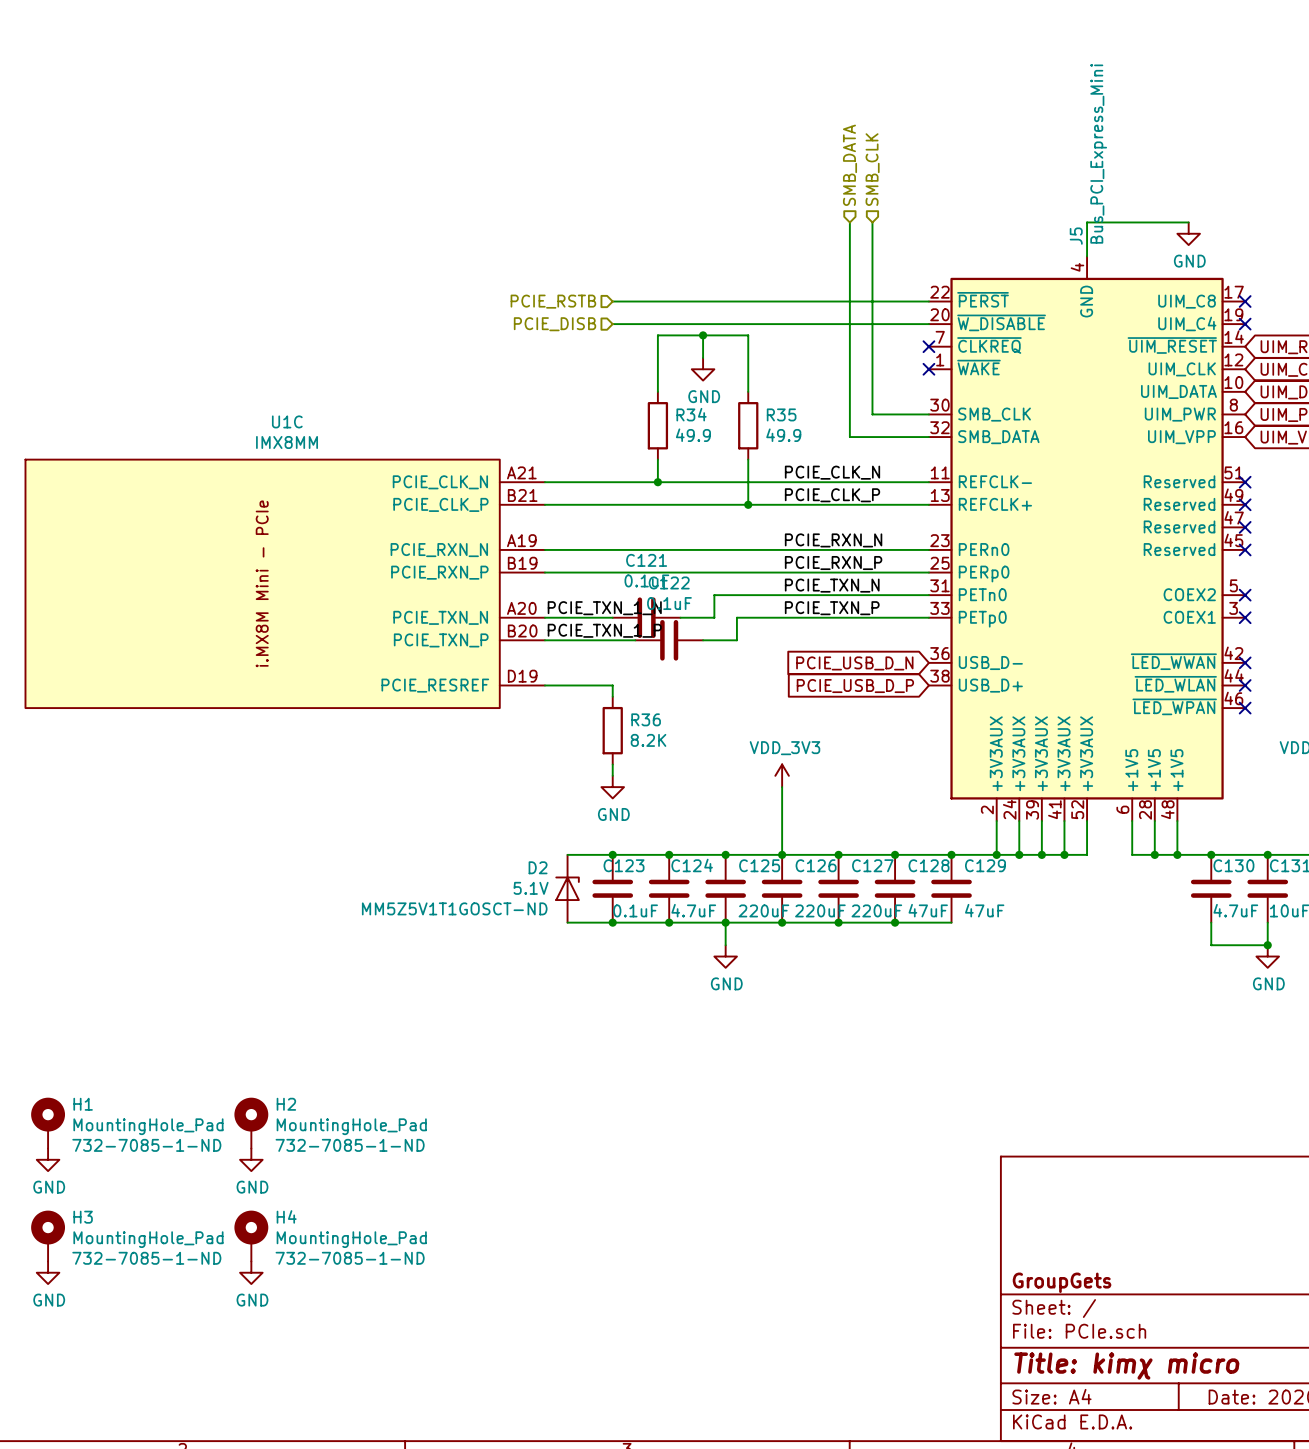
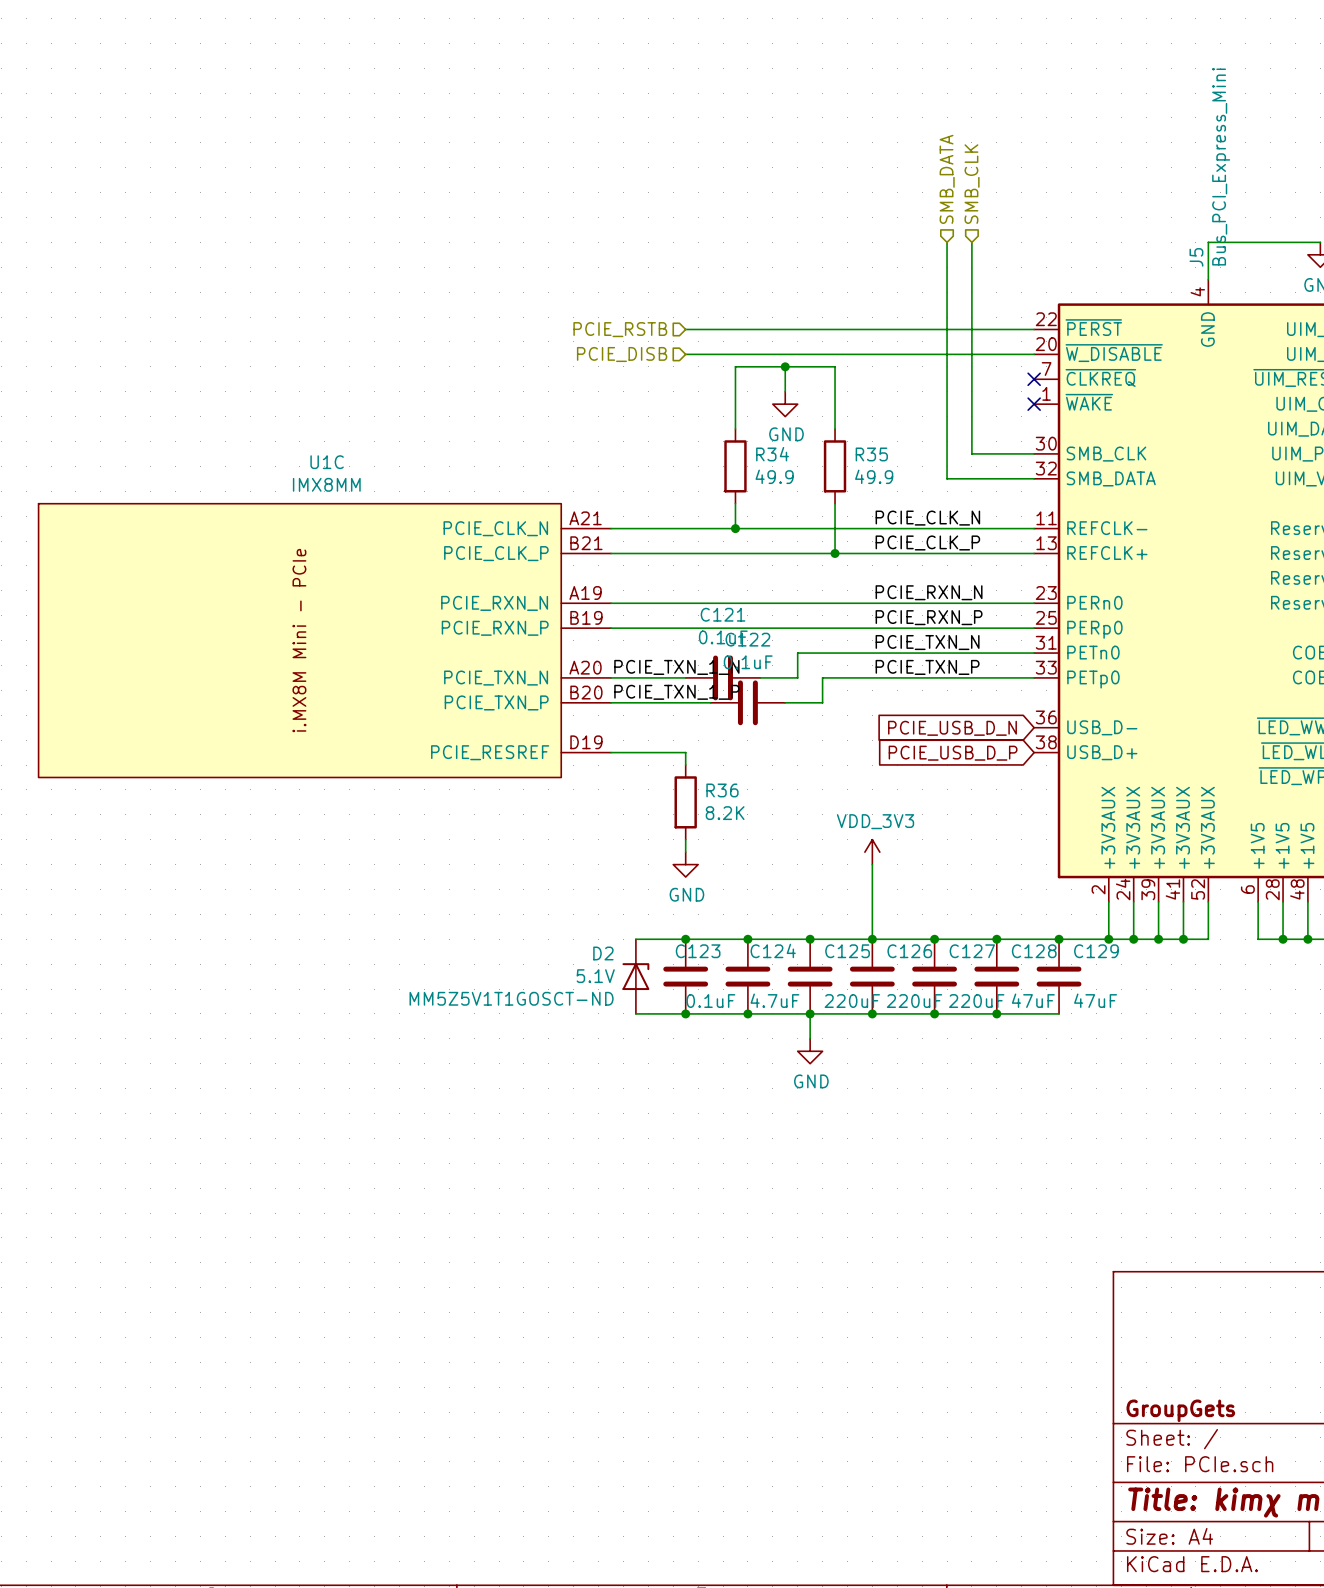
H1: MountingHole_Pad (48, 1123) -> none
H2: MountingHole_Pad (251, 1123) -> none
power symbol: GND (48, 1159) -> none
power symbol: GND (251, 1159) -> none
H3: MountingHole_Pad (48, 1236) -> none
H4: MountingHole_Pad (251, 1236) -> none
power symbol: GND (48, 1272) -> none
power symbol: GND (251, 1272) -> none

